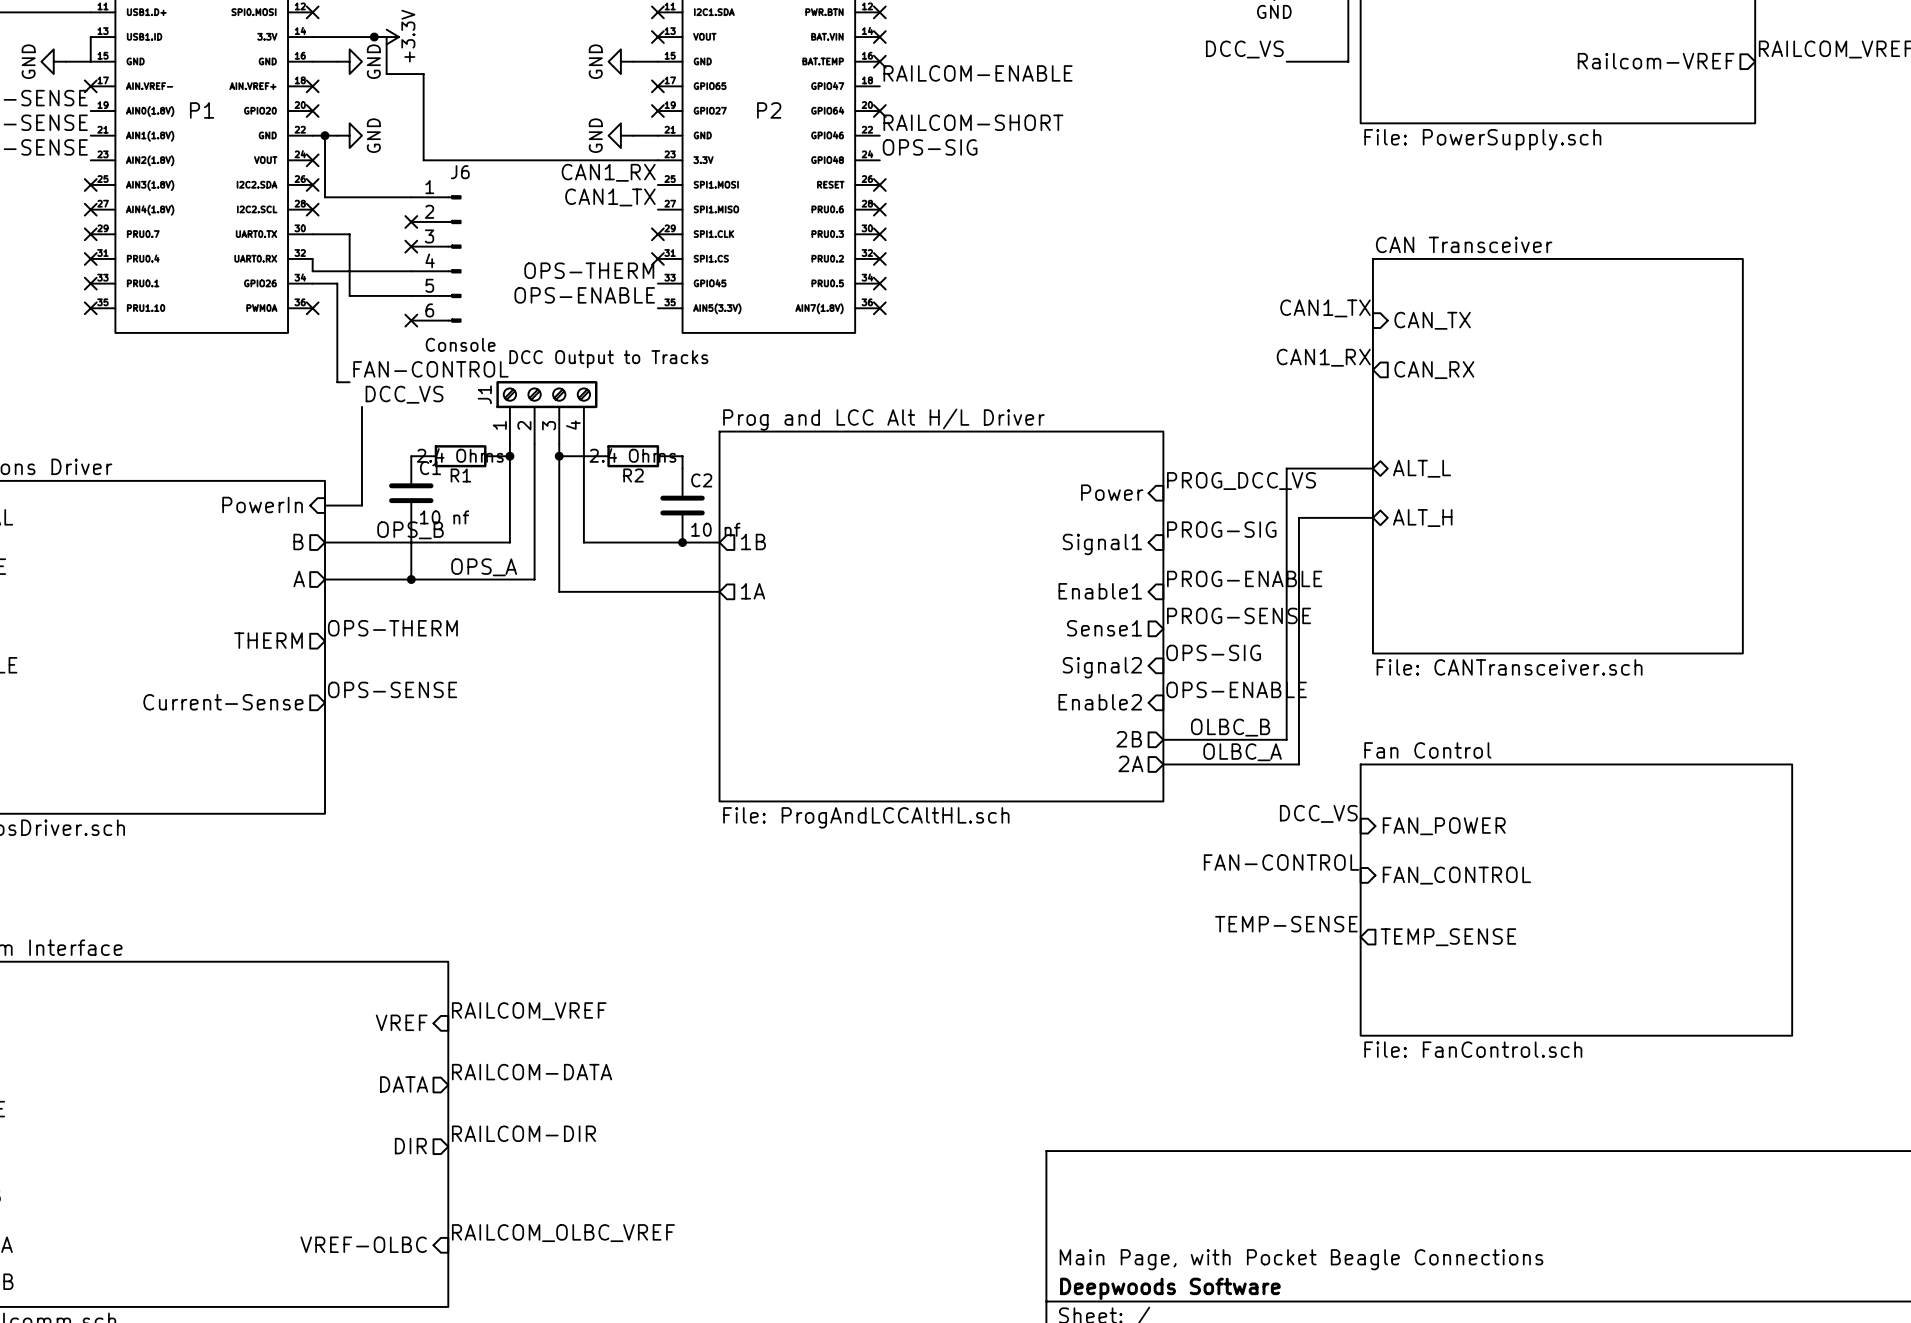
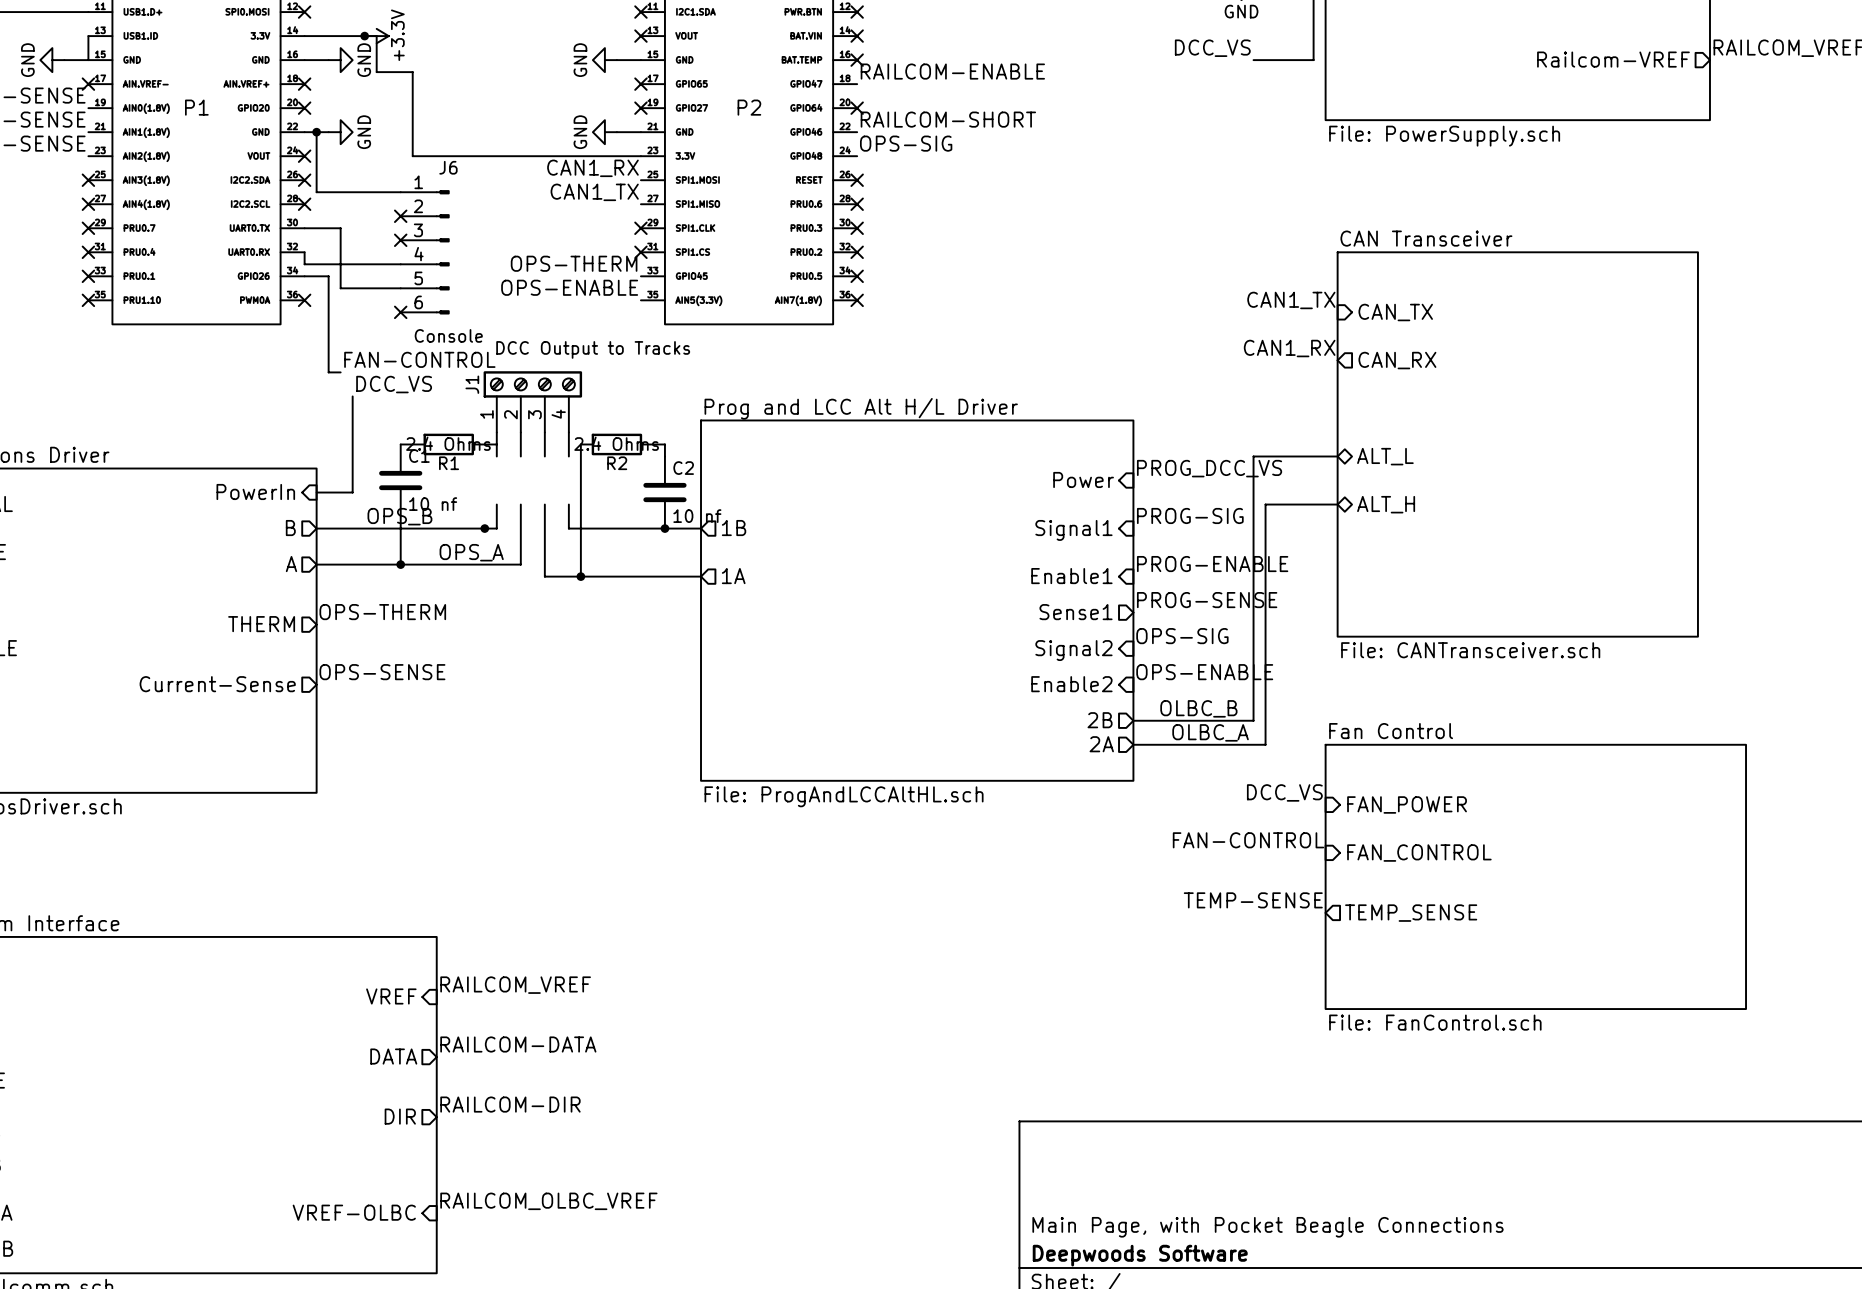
junction: (509, 456) -> none
wire: (559, 456) (596, 456) -> (580, 576) (580, 444)
junction: (559, 456) -> none
wire: (509, 468) (509, 517) -> none
wire: (534, 468) (534, 517) -> none
wire: (559, 468) (559, 517) -> none
wire: (583, 468) (583, 517) -> none
junction: none -> (484, 528)
junction: none -> (580, 576)

